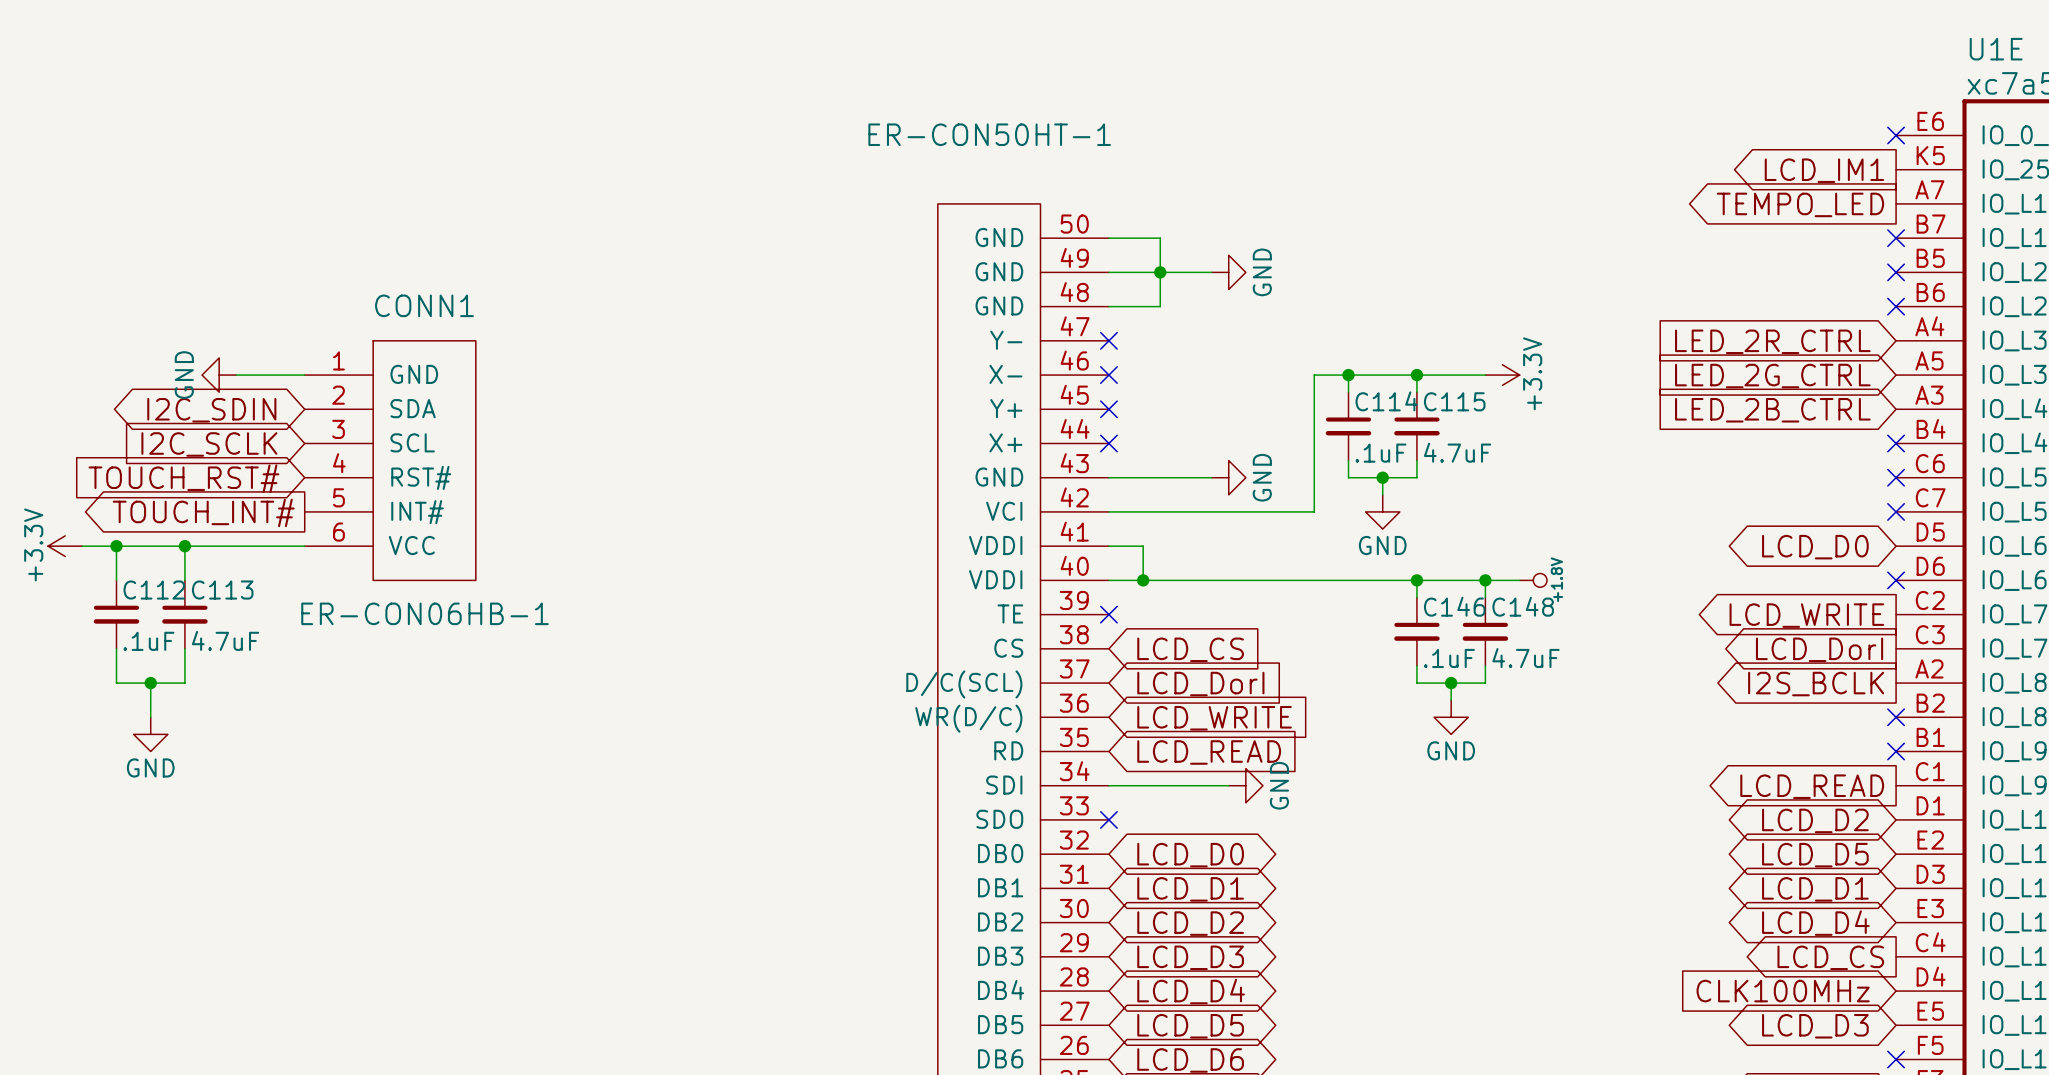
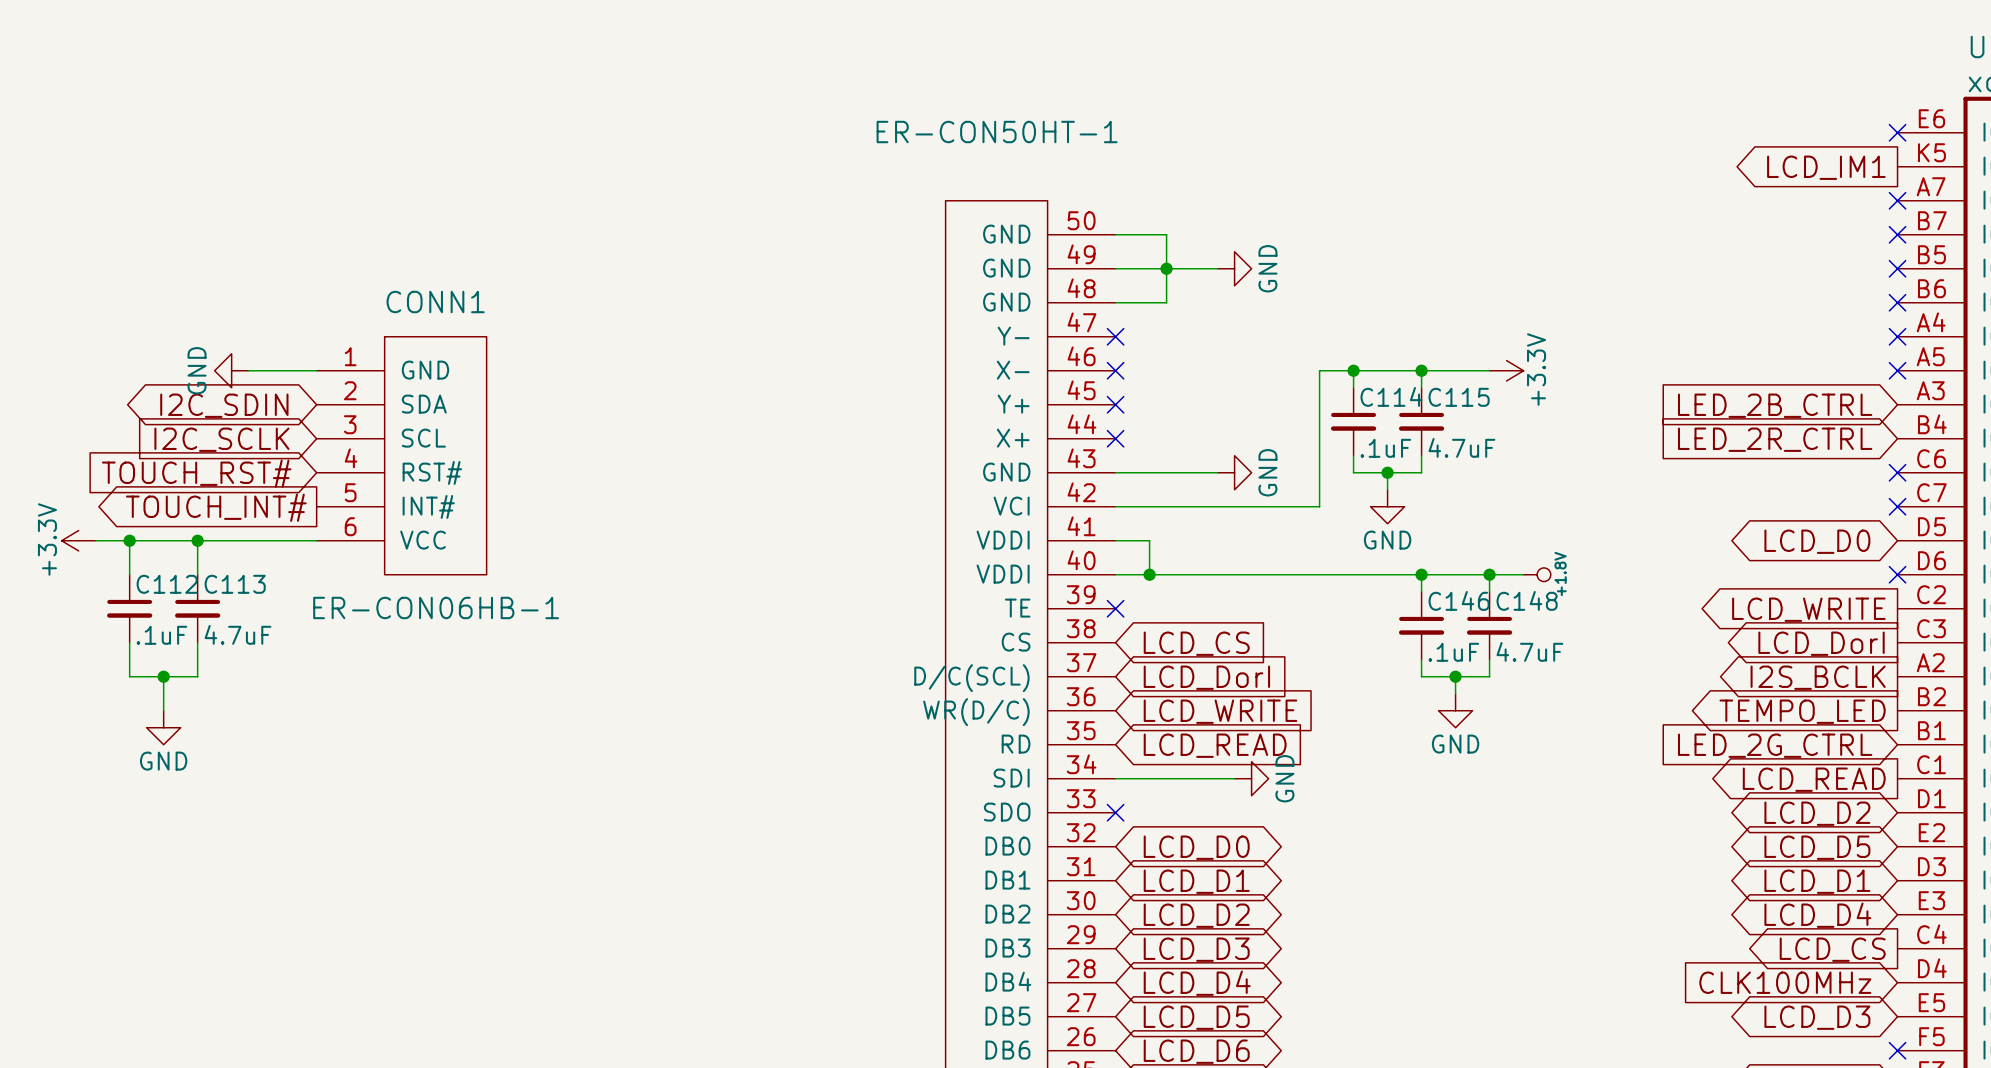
no-connect mark: none -> (1897, 200)
global label: TEMPO_LED (1800, 204) -> none
no-connect mark: none -> (1897, 336)
global label position: LED_2R_CTRL (1772, 341) -> LED_2R_CTRL (1775, 439)
no-connect mark: none -> (1897, 370)
global label: LED_2G_CTRL (1772, 376) -> none
no-connect mark: (1896, 443) -> none
no-connect mark: (1896, 717) -> none
global label: none -> TEMPO_LED (1802, 711)
no-connect mark: (1896, 751) -> none
global label: none -> LED_2G_CTRL (1775, 745)

